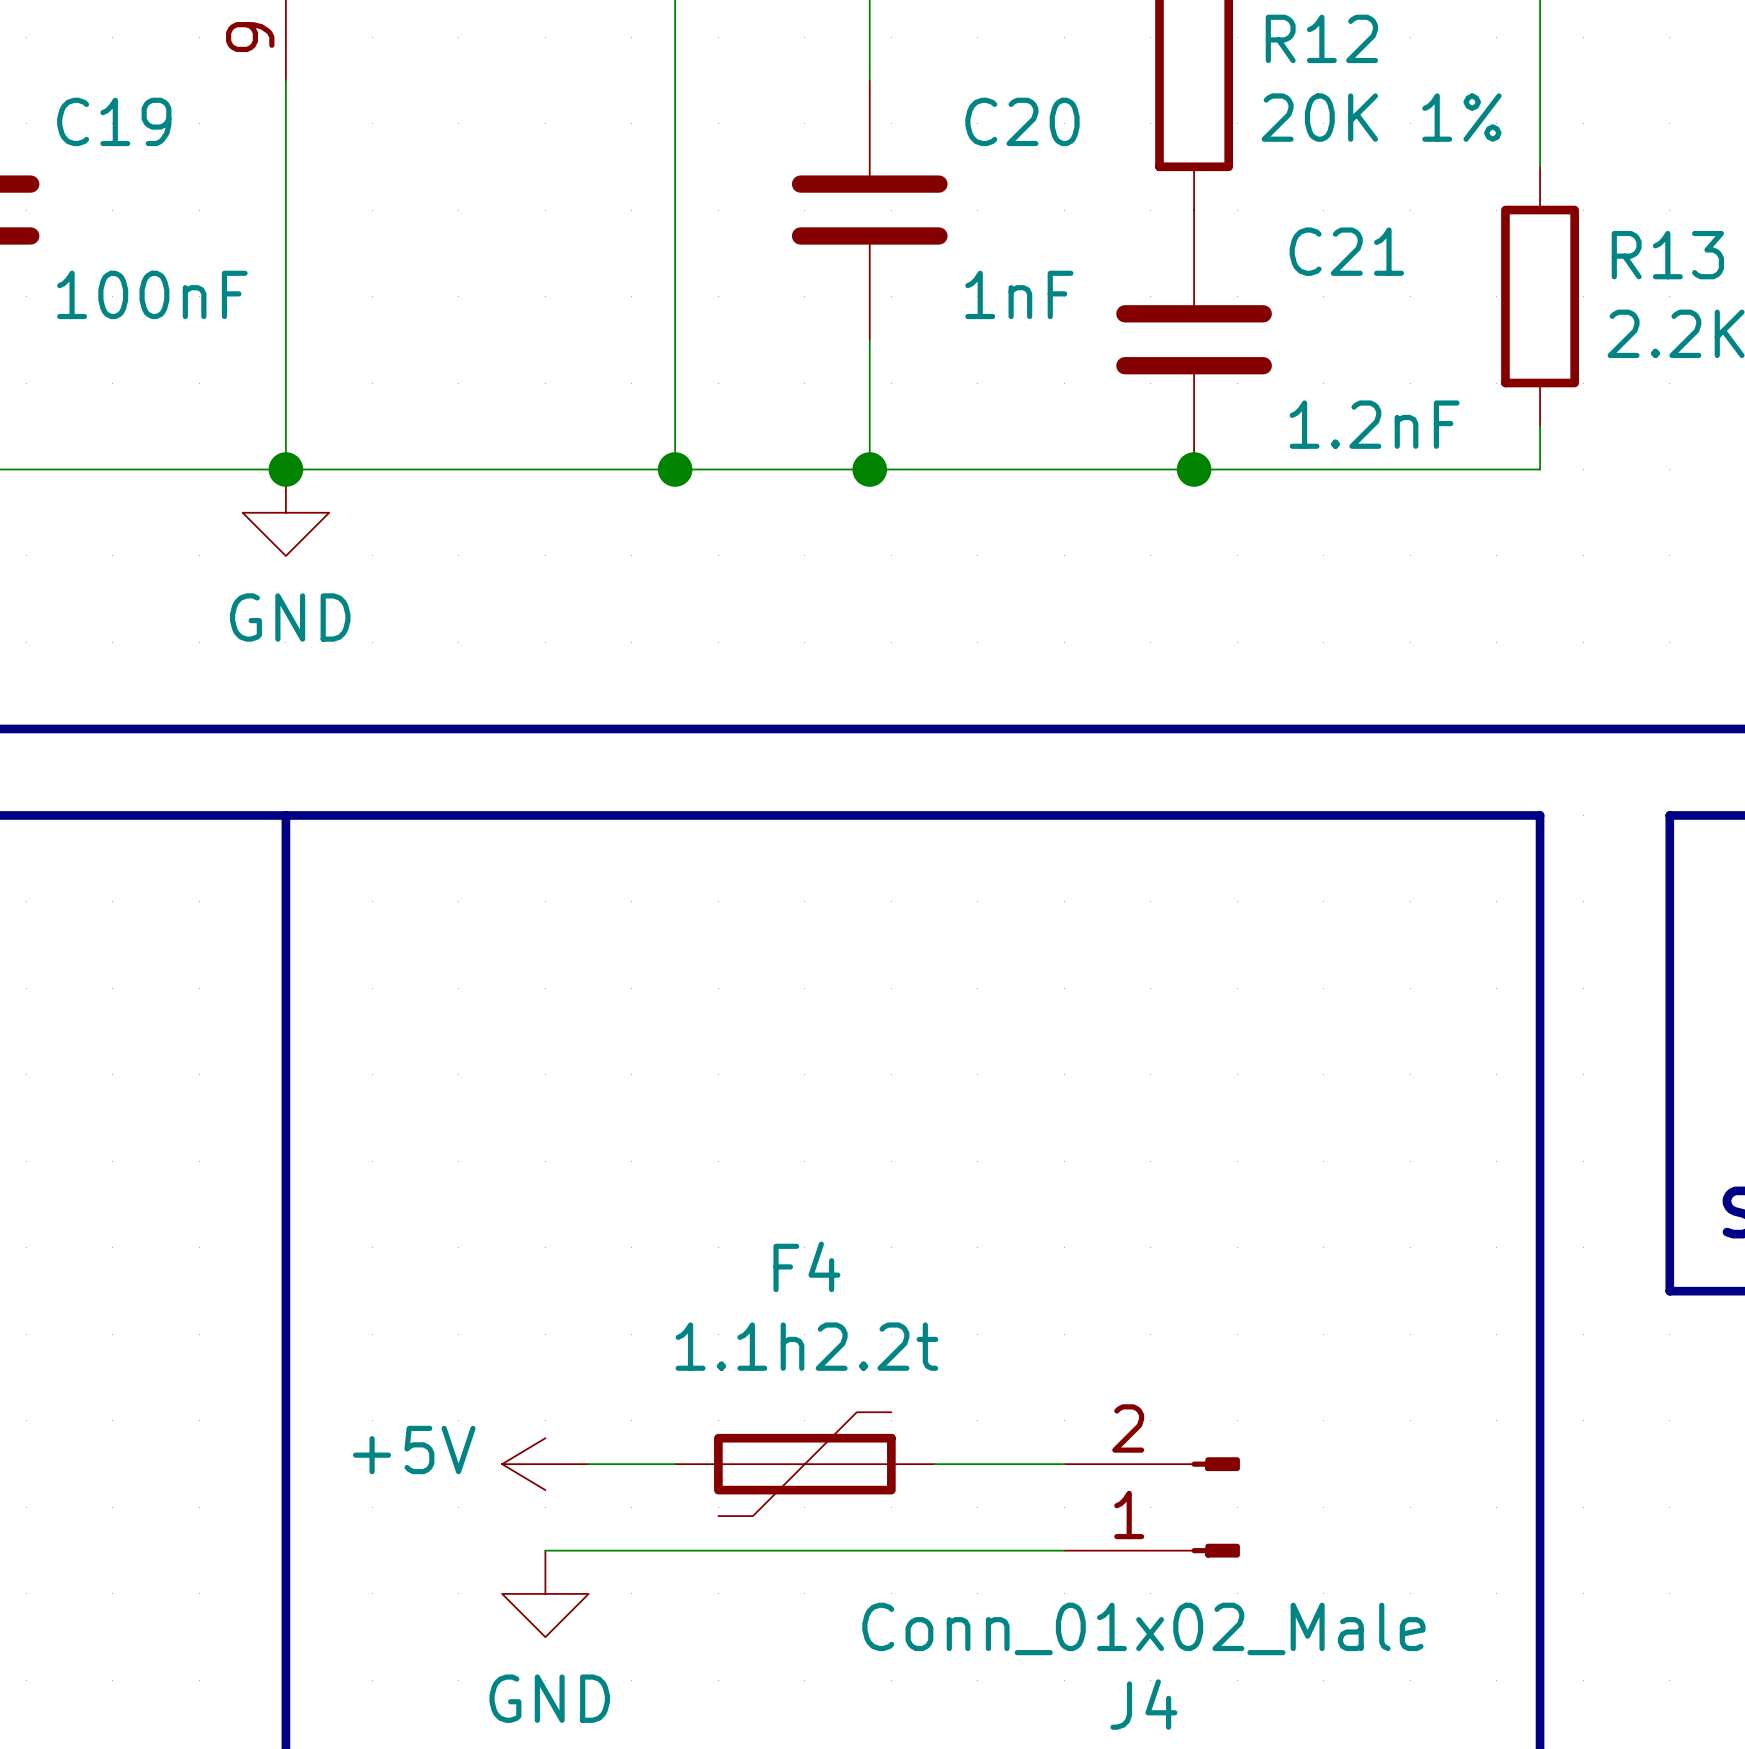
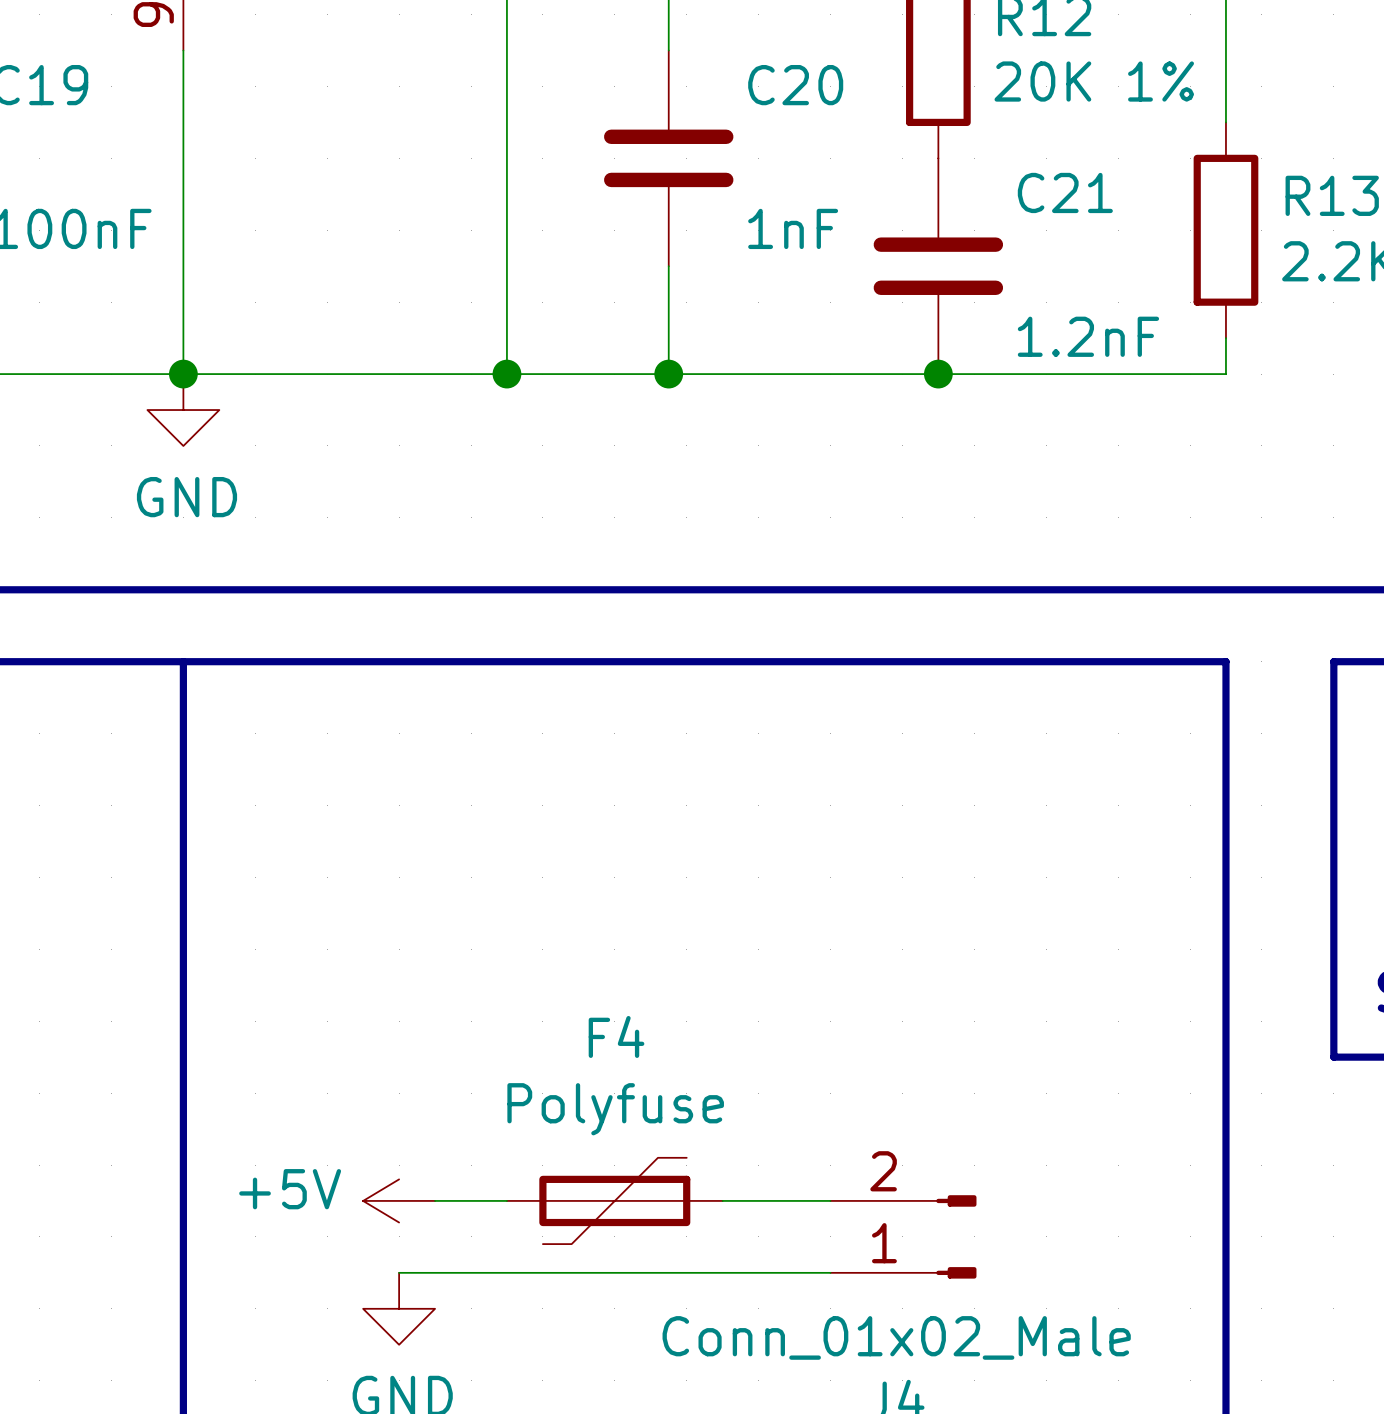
F4 value: 1.1h2.2t (806, 1346) -> Polyfuse (615, 1109)

